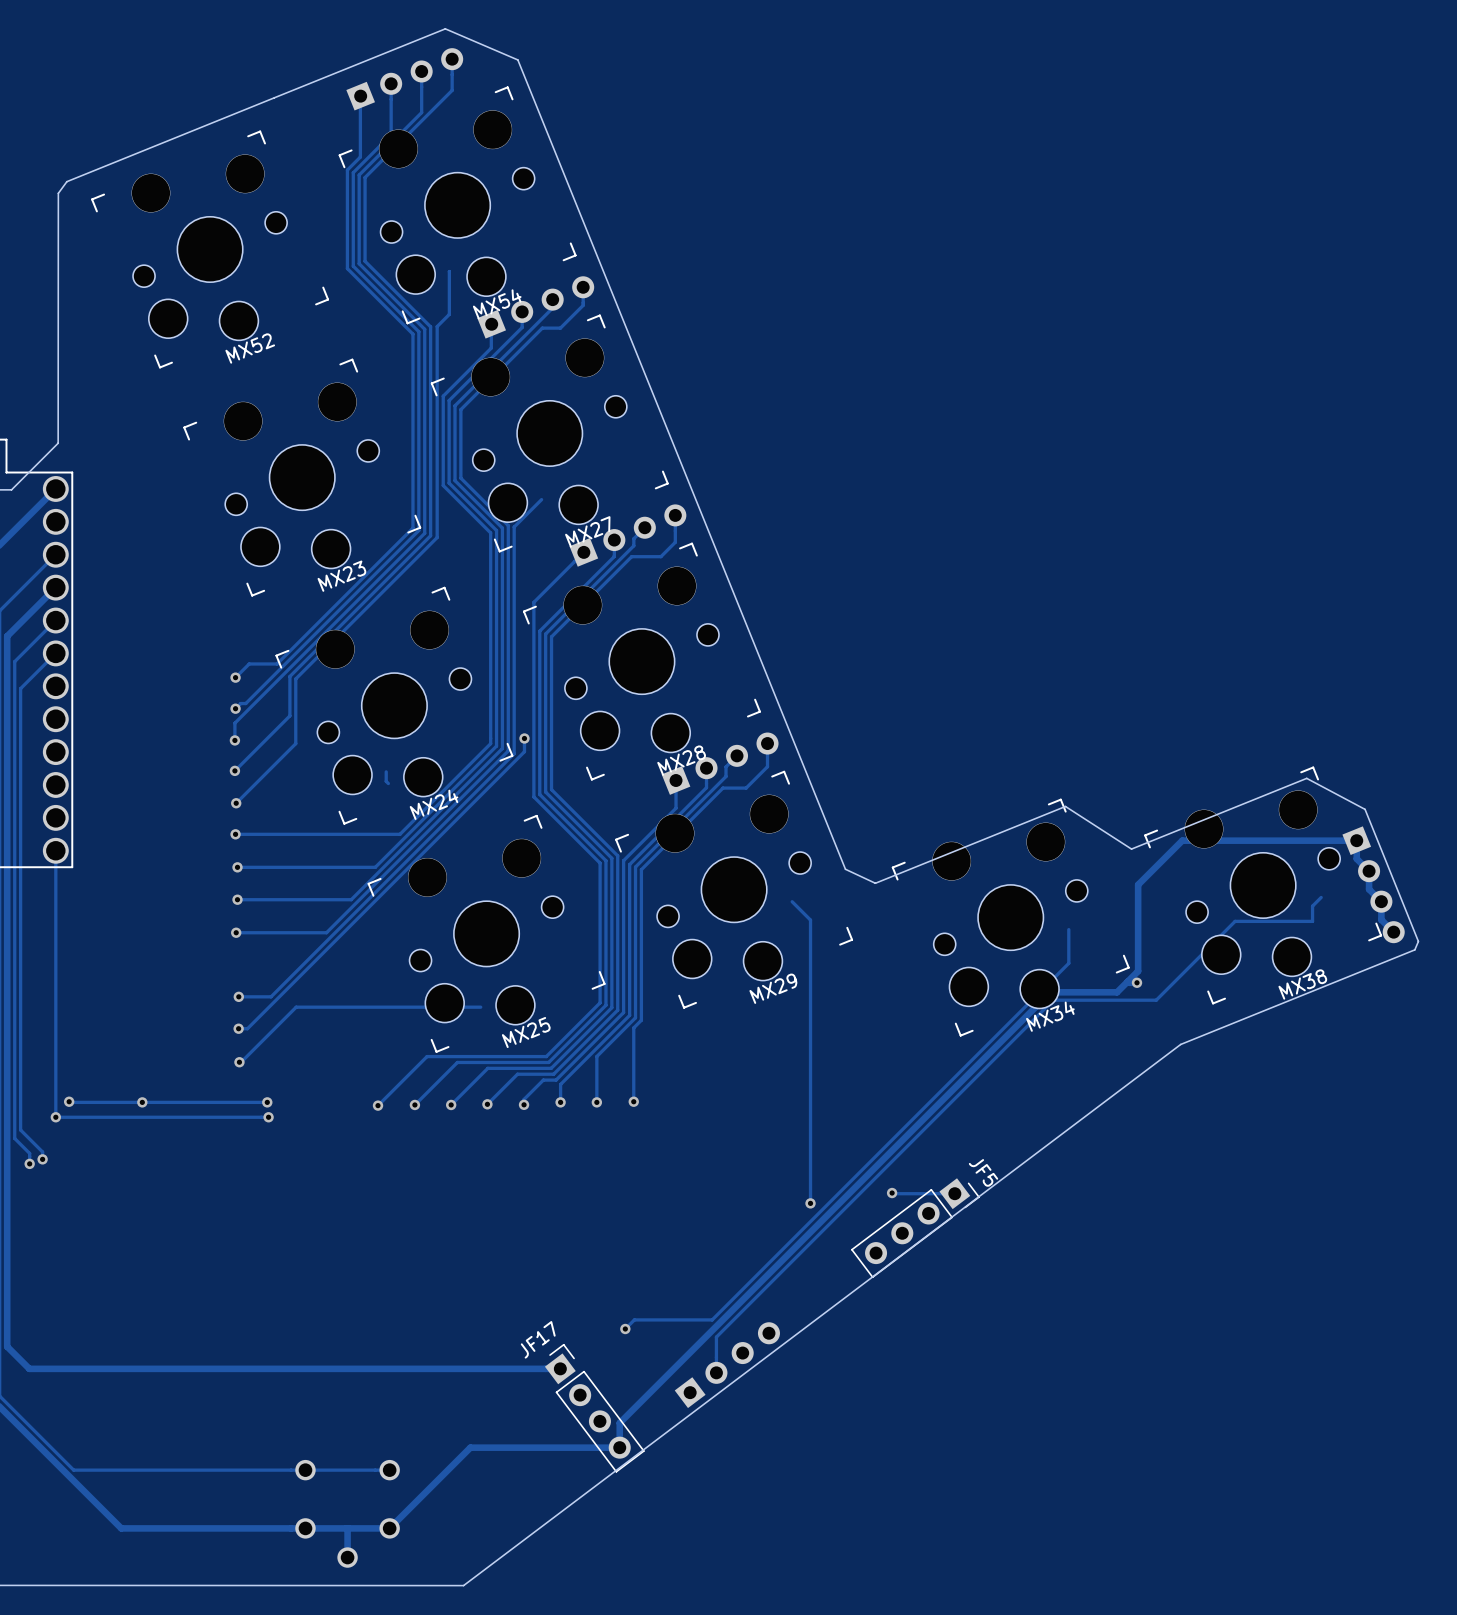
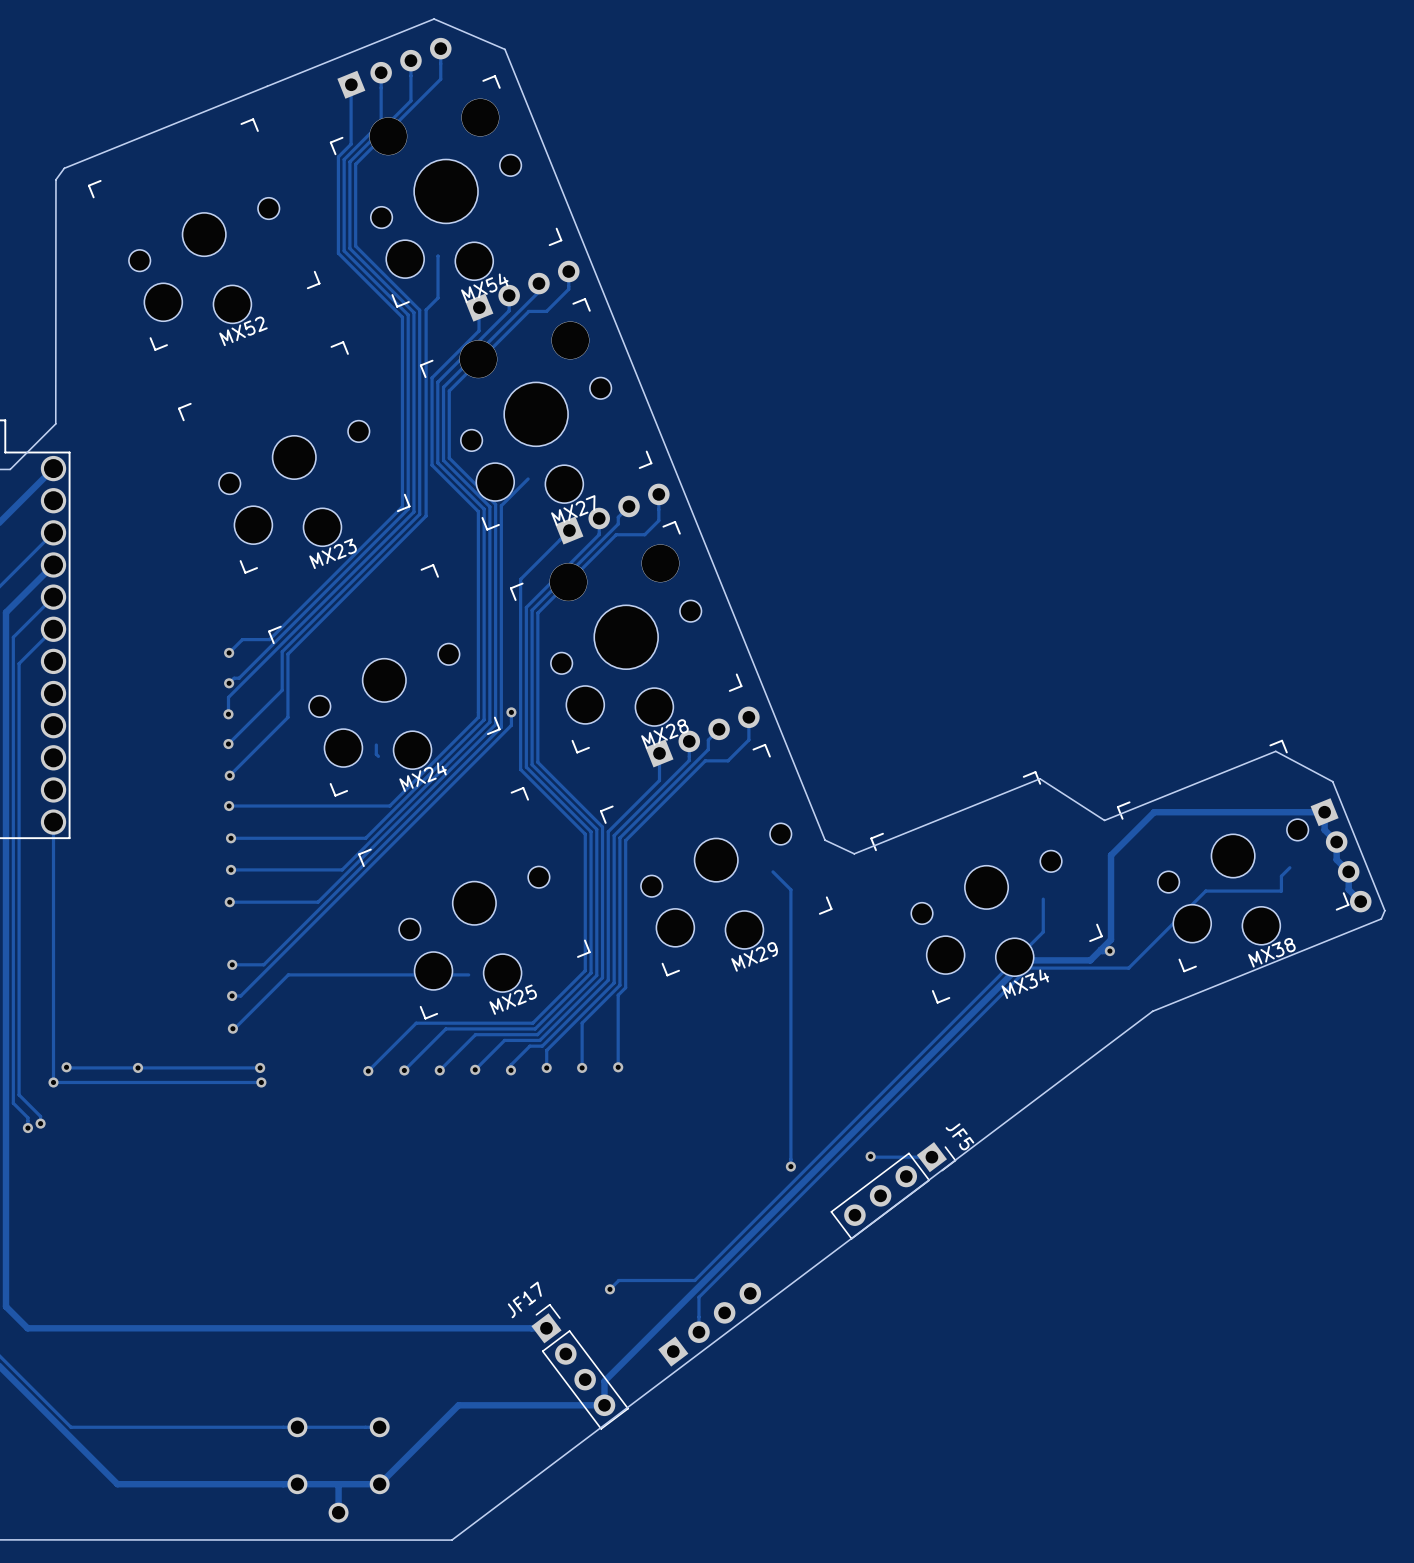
MX52 footprint: [91, 130, 330, 369] -> [87, 118, 321, 351]
MX23 footprint: [183, 358, 422, 597] -> [178, 341, 411, 574]
MX24 footprint: [275, 586, 514, 825] -> [268, 564, 501, 797]
MX38 footprint: [1144, 766, 1383, 1005] -> [1116, 739, 1350, 973]
MX29 footprint: [615, 770, 854, 1009] -> [600, 743, 833, 977]
MX34 footprint: [891, 798, 1130, 1037] -> [870, 771, 1103, 1004]
MX25 footprint: [367, 814, 606, 1053] -> [358, 787, 591, 1020]

